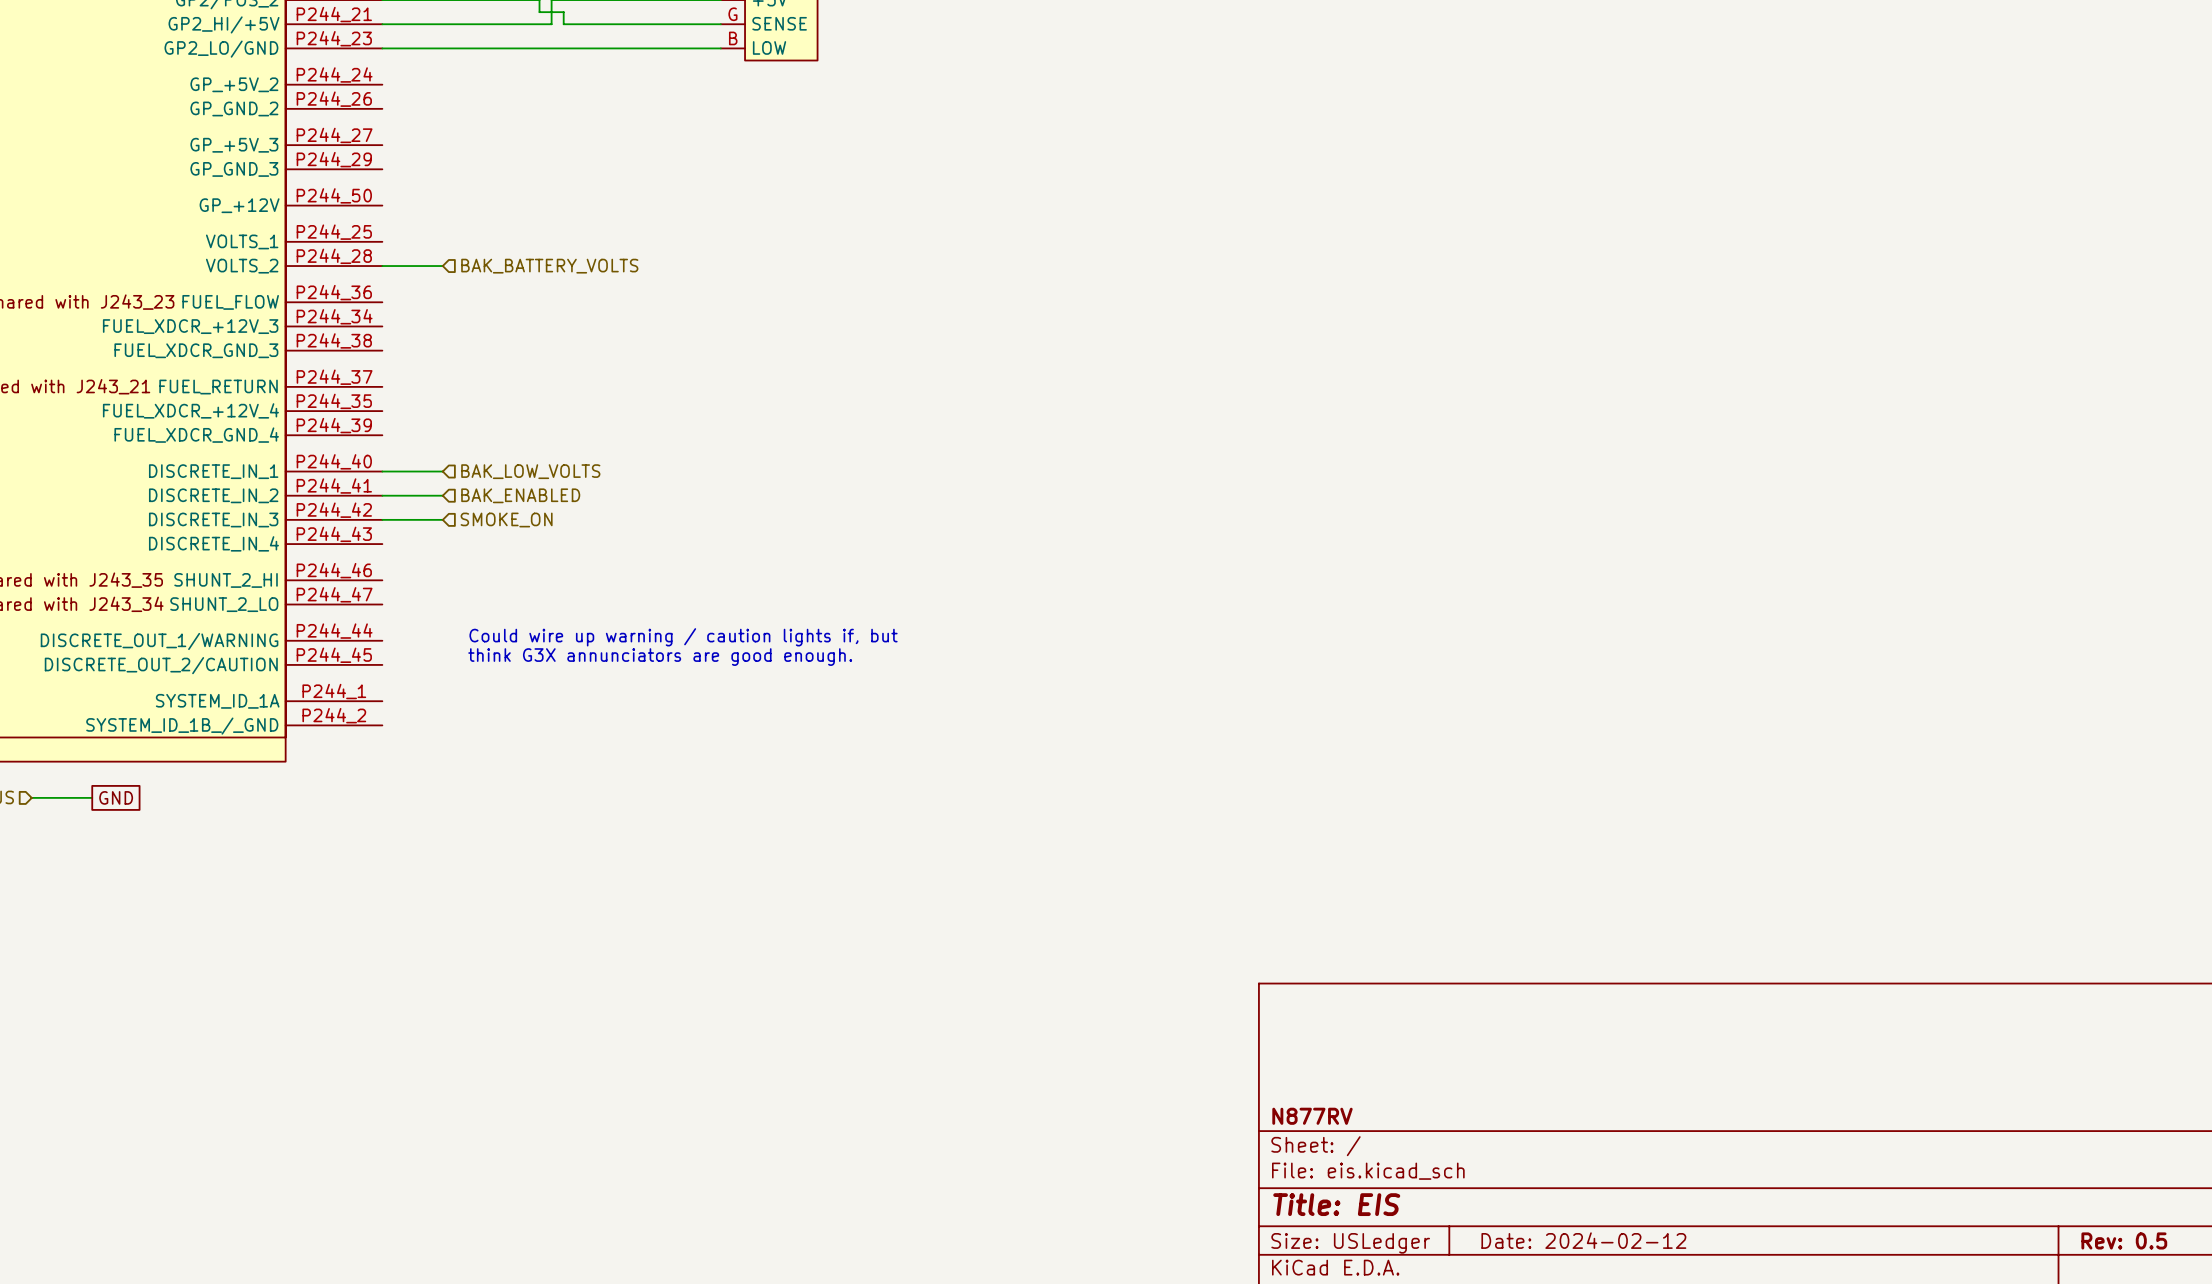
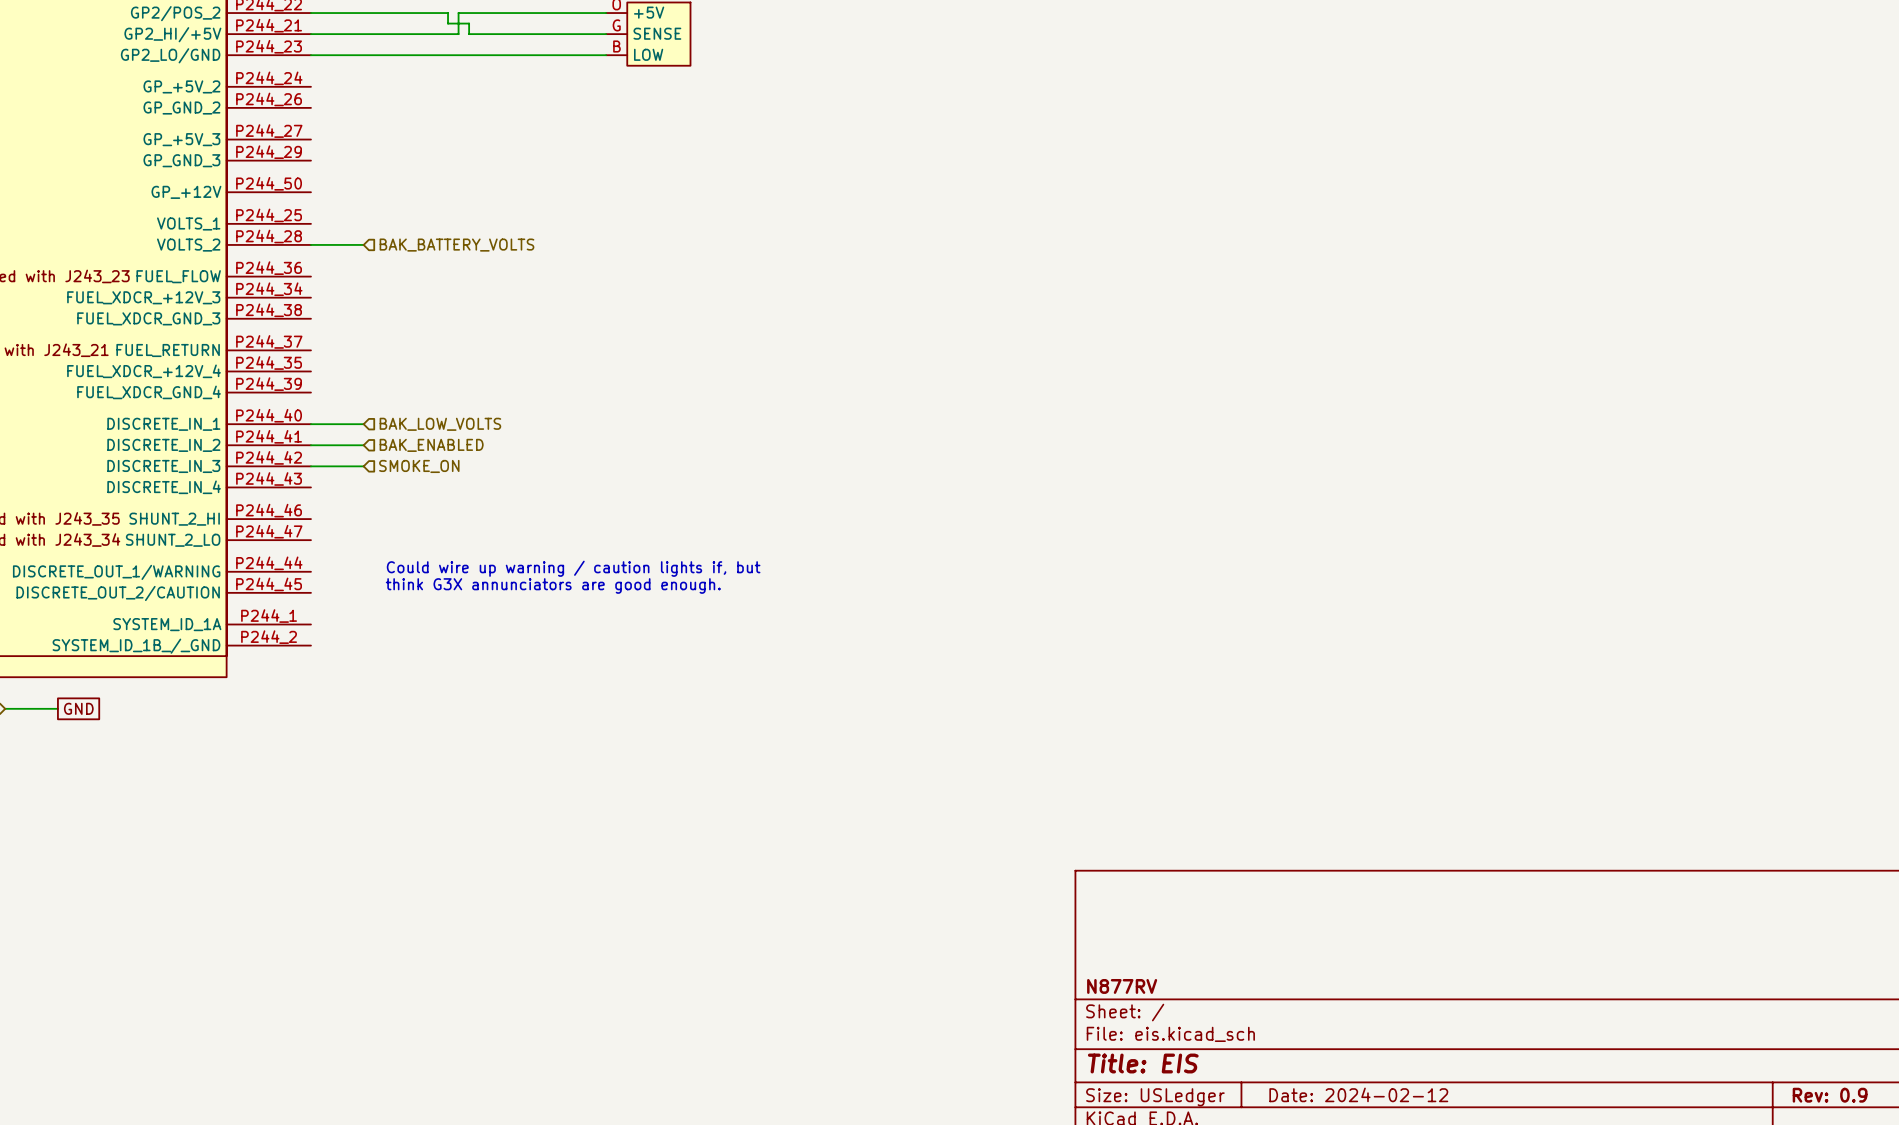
title block: Rev: 0.5 (2124, 1240) -> Rev: 0.9 (1830, 1095)

